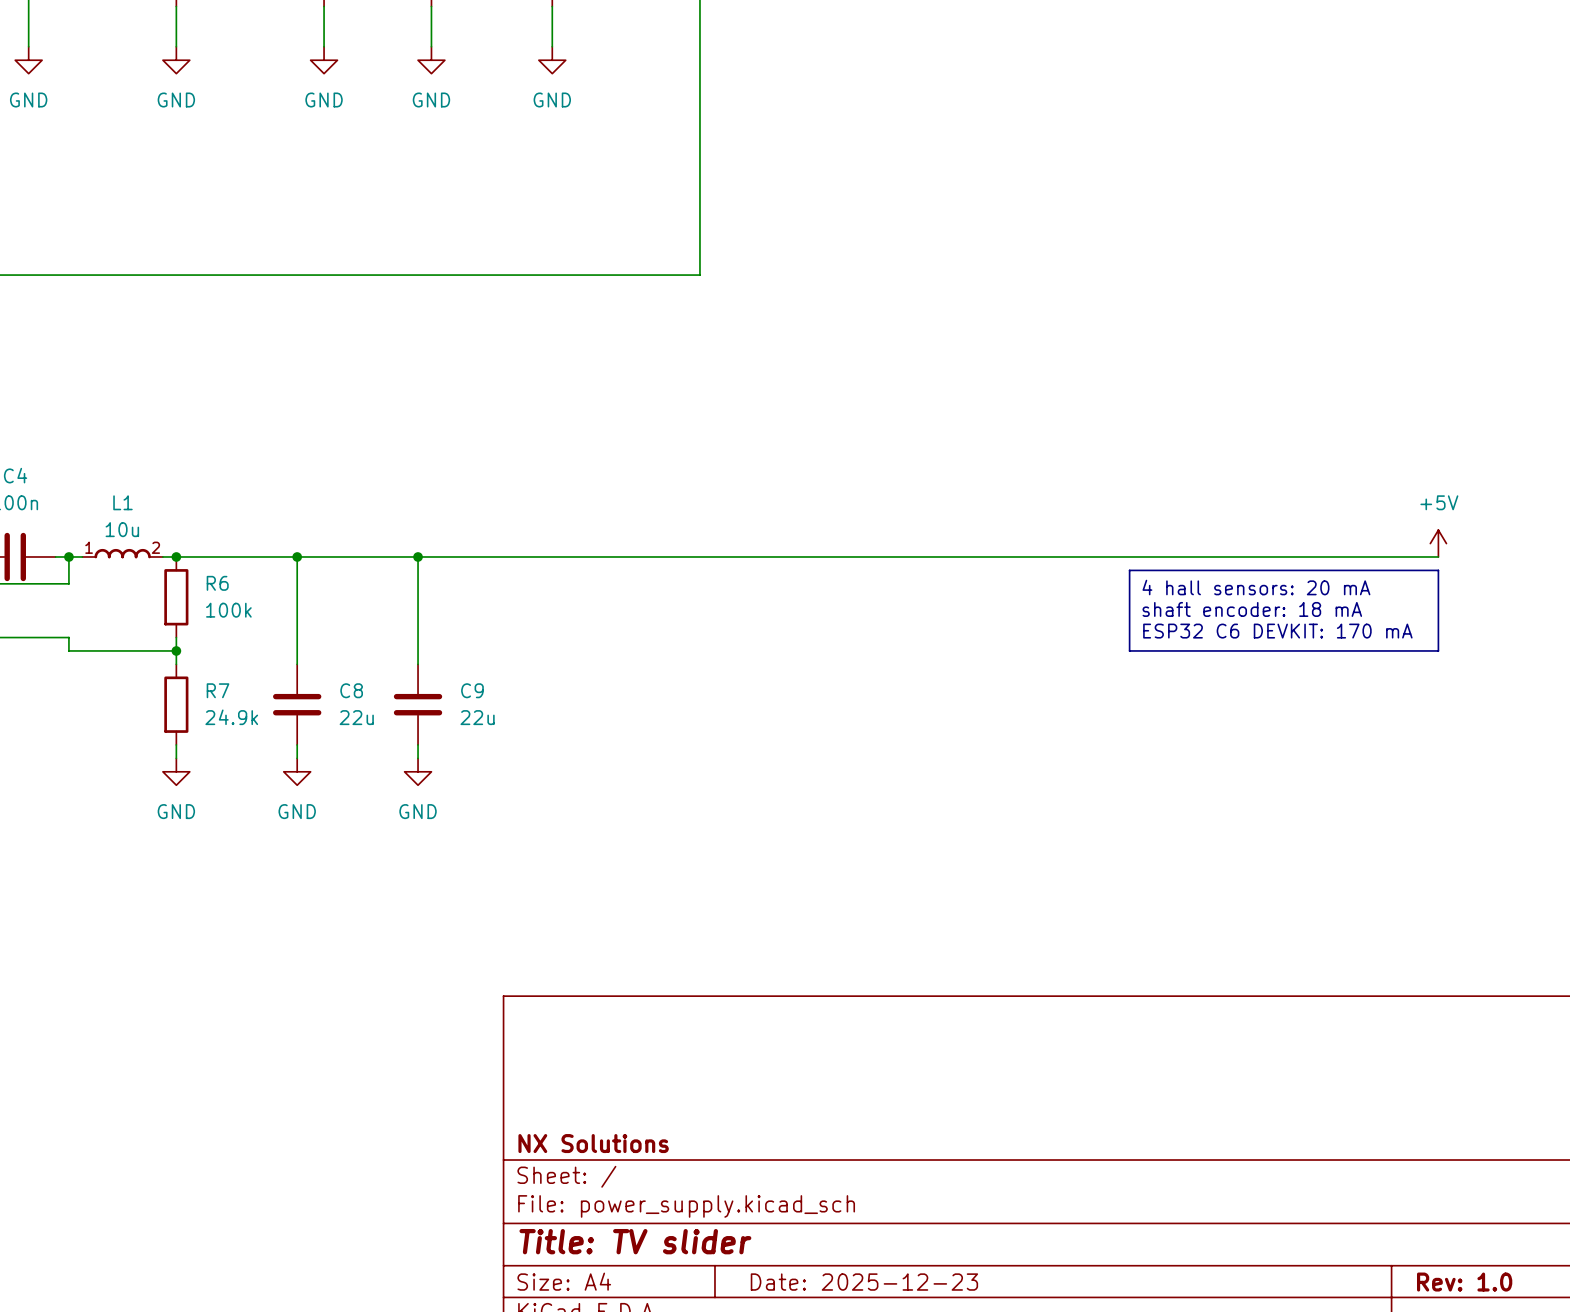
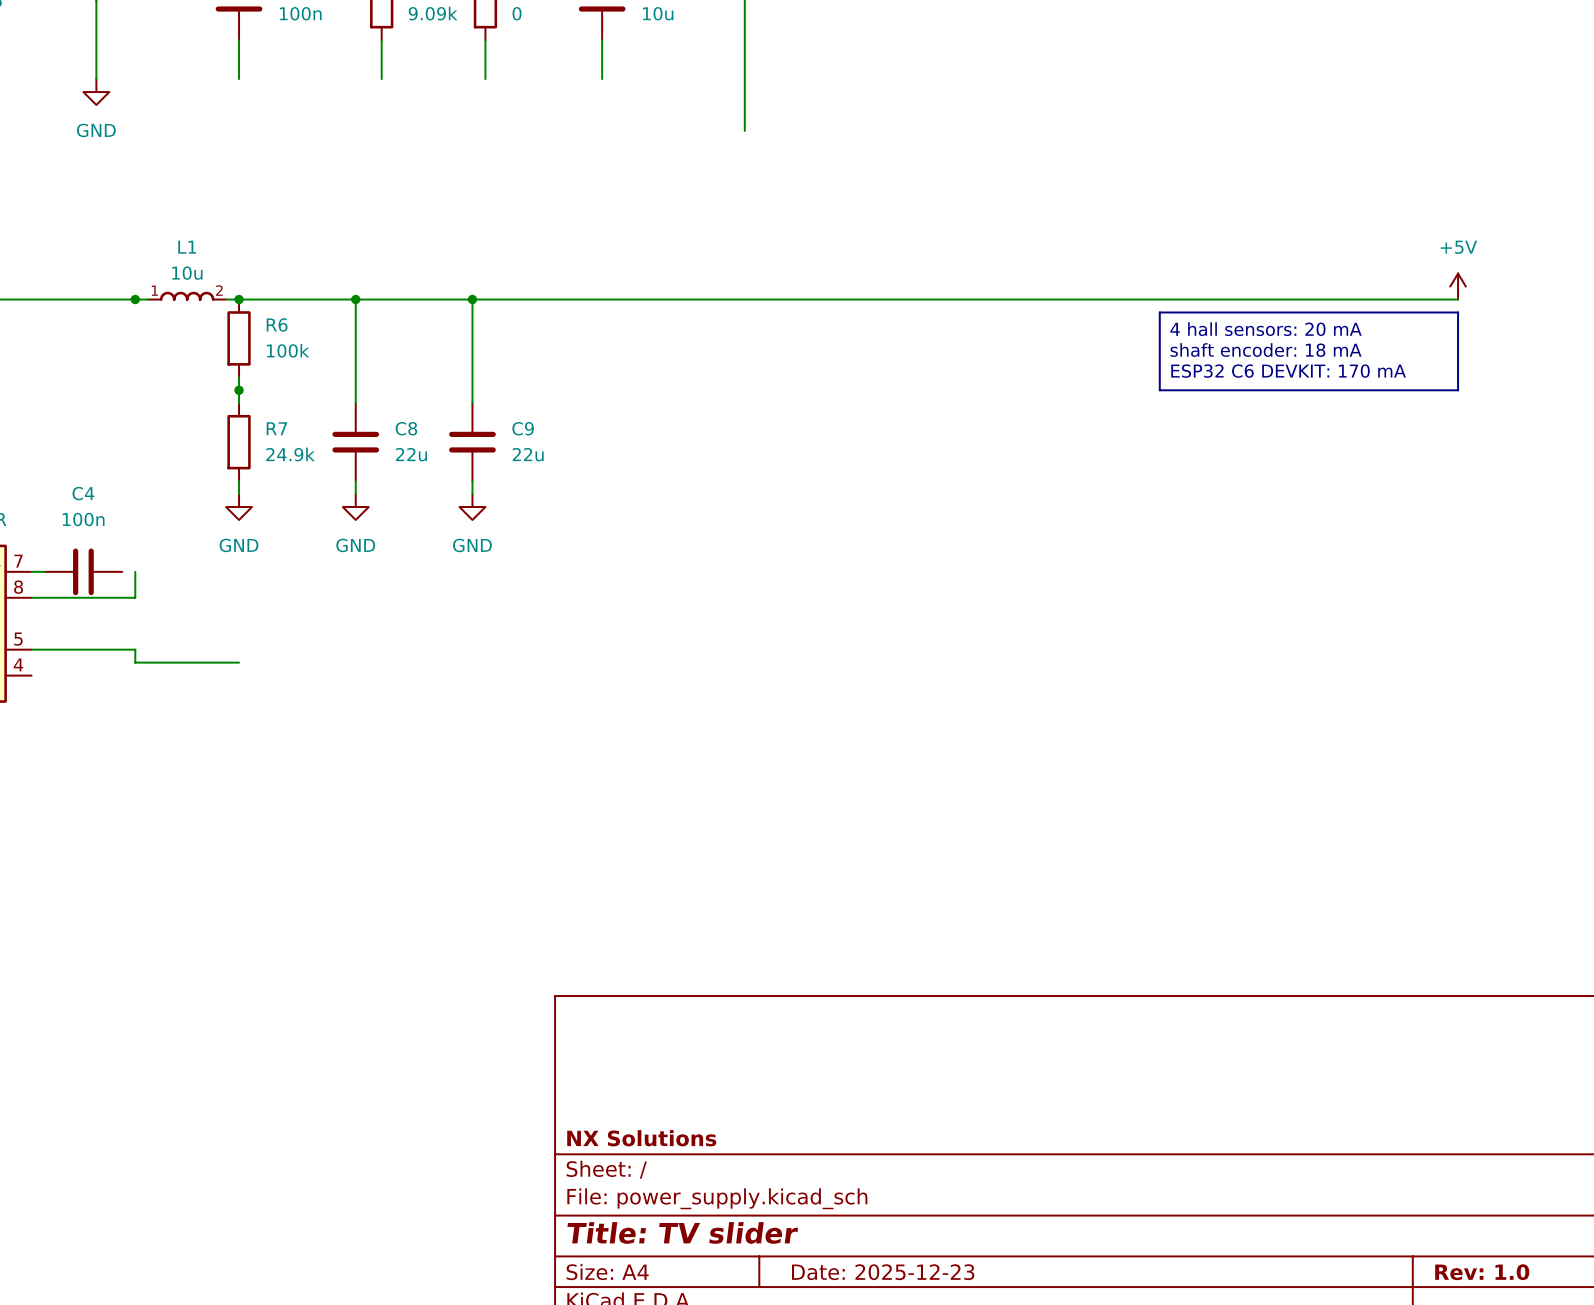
power symbol: GND (176, 60) -> none
power symbol: GND (324, 60) -> none
power symbol: GND (431, 60) -> none
power symbol: GND (552, 60) -> none
wire: (699, 100) (699, 275) -> (1458, 299) (744, 299)
power symbol: none -> +5V (1458, 286)
junction: none -> (135, 299)
wire: (82, 275) (162, 275) -> none
junction: none -> (239, 299)
wire: none -> (355, 299) (355, 403)
junction: none -> (355, 299)
wire: none -> (472, 299) (472, 403)
junction: none -> (472, 299)
line: none -> (1159, 312) (1458, 312) (1458, 390) (1159, 390) (1159, 312)
text: none -> 4 hall sensors: 20 mA (1266, 329)
text: none -> shaft encoder: 18 mA (1266, 350)
text: none -> ESP32 C6 DEVKIT: 170 mA (1288, 371)
wire: none -> (239, 377) (239, 403)
junction: none -> (239, 390)
wire: none -> (239, 481) (239, 494)
wire: none -> (355, 481) (355, 494)
wire: none -> (472, 481) (472, 494)
power symbol: none -> GND (239, 507)
power symbol: none -> GND (355, 507)
power symbol: none -> GND (472, 507)
power symbol: +5V (1438, 543) -> none
L1 position: (122, 553) -> (187, 296)
wire: (55, 556) (82, 556) -> none
junction: (68, 556) -> none
wire: (162, 556) (1438, 556) -> none
junction: (176, 556) -> none
wire: (297, 556) (297, 664) -> none
junction: (297, 556) -> none
wire: (418, 556) (418, 664) -> none
junction: (418, 556) -> none
line: (1129, 570) (1438, 570) (1438, 650) (1129, 650) (1129, 570) -> none
text: 4 hall sensors: 20 mA (1256, 587) -> none
R6 position: (176, 597) -> (239, 338)
text: shaft encoder: 18 mA (1252, 609) -> none
text: ESP32 C6 DEVKIT: 170 mA (1277, 631) -> none
wire: (176, 637) (176, 664) -> none
junction: (176, 650) -> none
R7 position: (176, 704) -> (239, 442)
C8 position: (297, 704) -> (355, 442)
C9 position: (418, 704) -> (472, 442)
wire: (176, 744) (176, 758) -> none
wire: (297, 744) (297, 758) -> none
wire: (418, 744) (418, 758) -> none
power symbol: GND (176, 771) -> none
power symbol: GND (297, 771) -> none
power symbol: GND (418, 771) -> none

